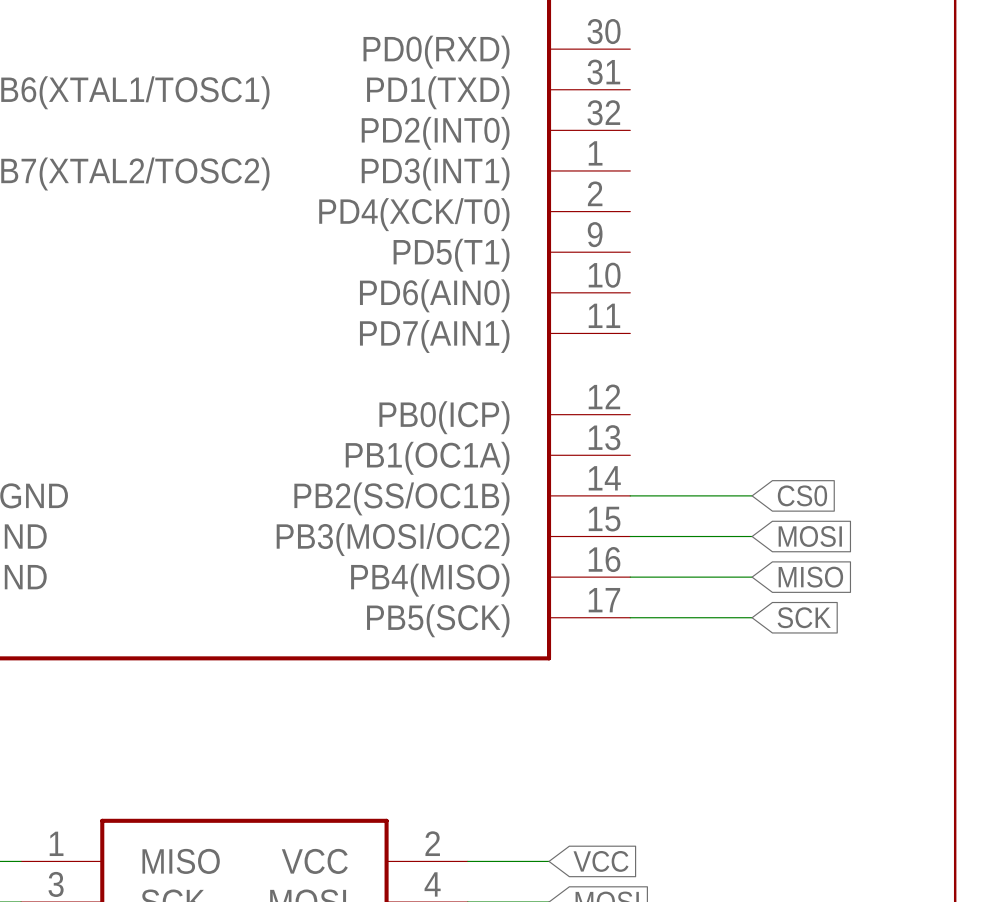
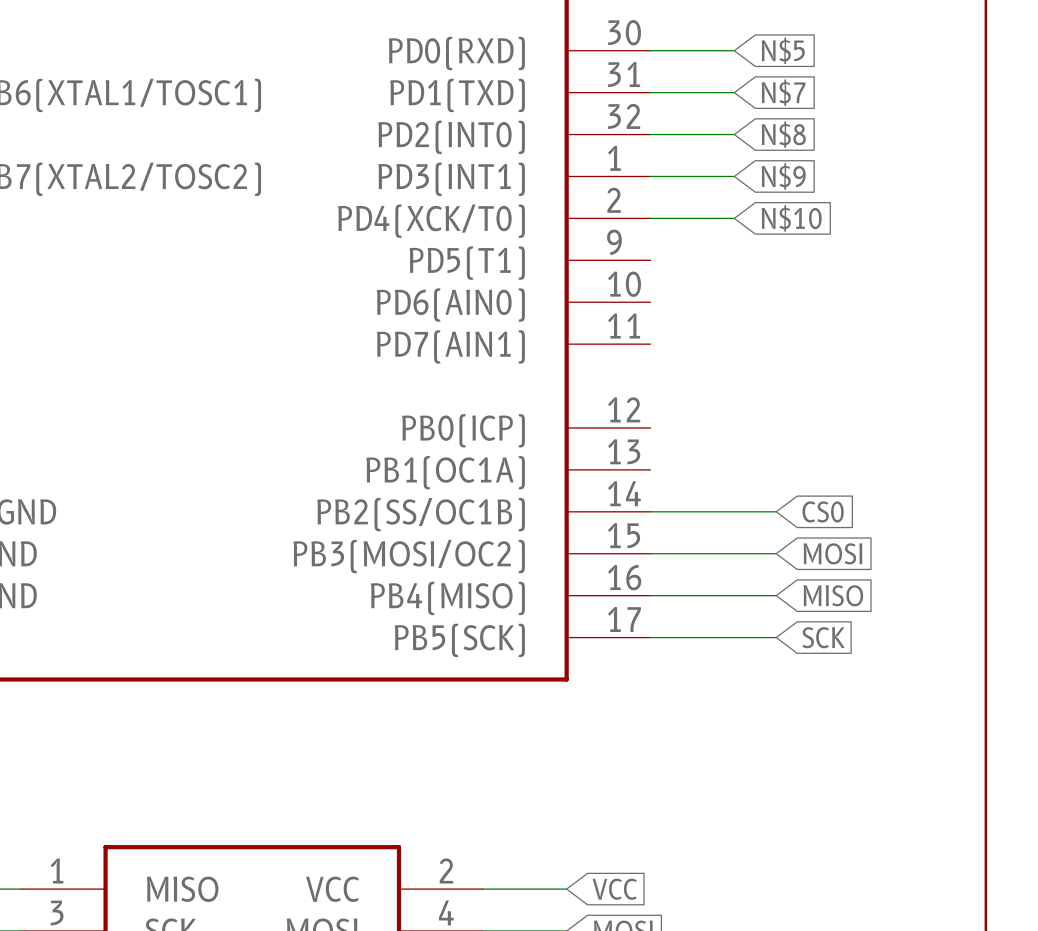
wire: none -> (650, 50) (734, 50)
global label: none -> N$5 (783, 50)
wire: none -> (650, 92) (734, 92)
global label: none -> N$7 (783, 92)
wire: none -> (650, 134) (734, 134)
global label: none -> N$8 (783, 134)
wire: none -> (650, 176) (734, 176)
global label: none -> N$9 (783, 176)
wire: none -> (650, 218) (734, 218)
global label: none -> N$10 (791, 218)

